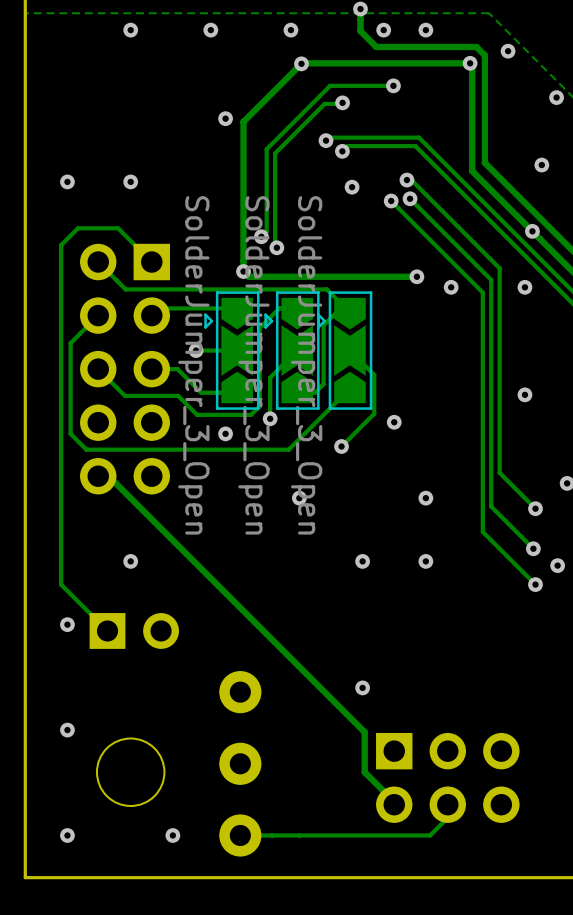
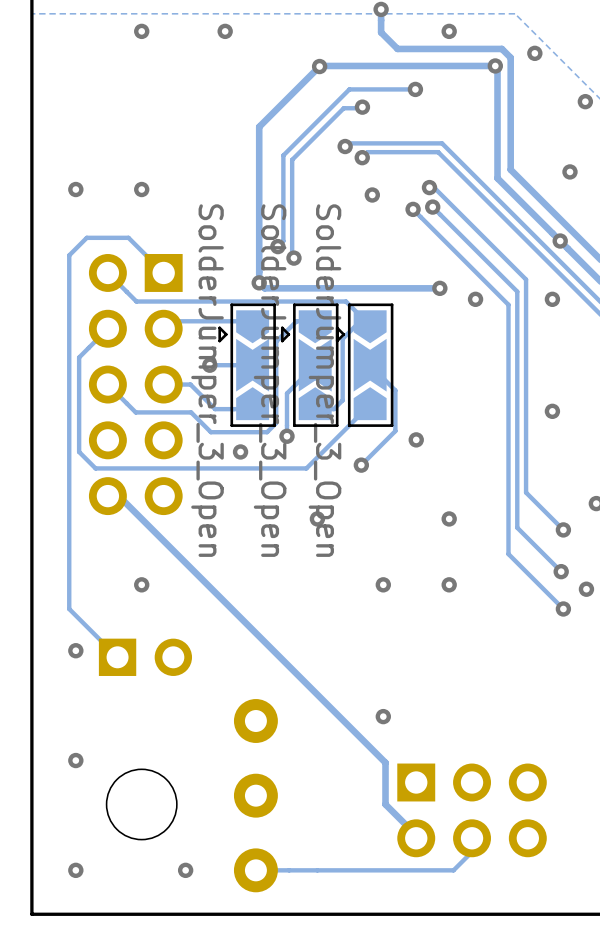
via: (290, 30) -> none
via: (383, 30) -> none
via: (225, 118) -> none

